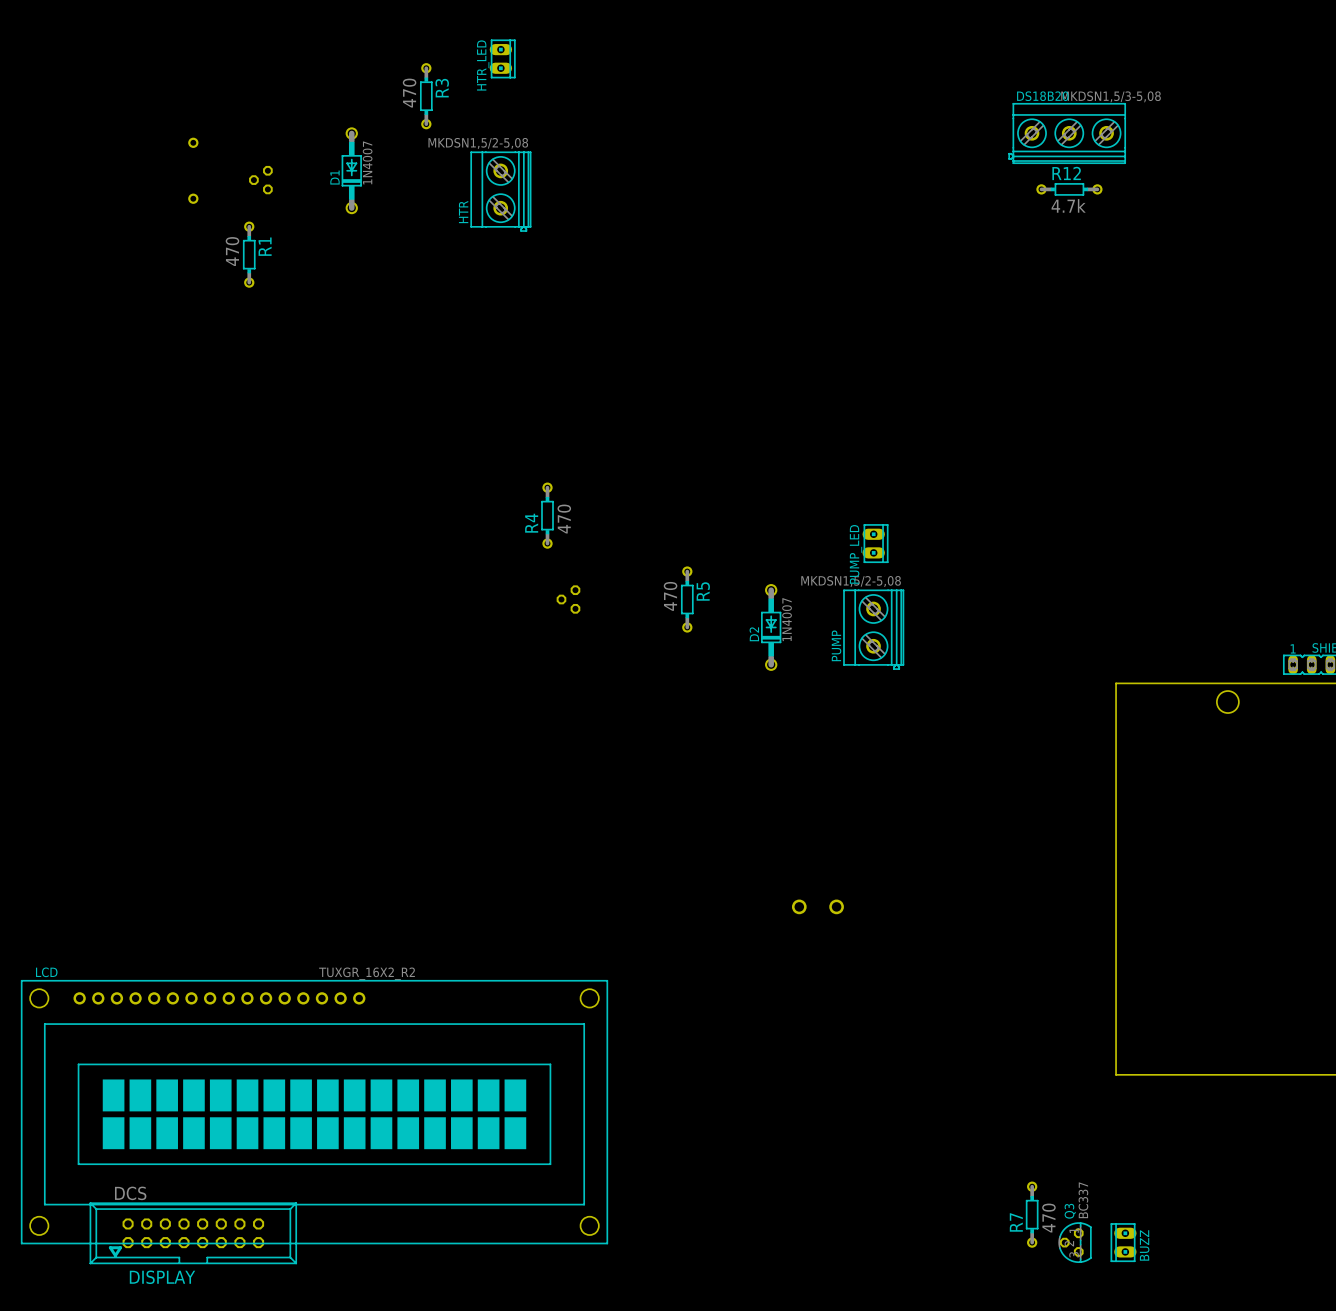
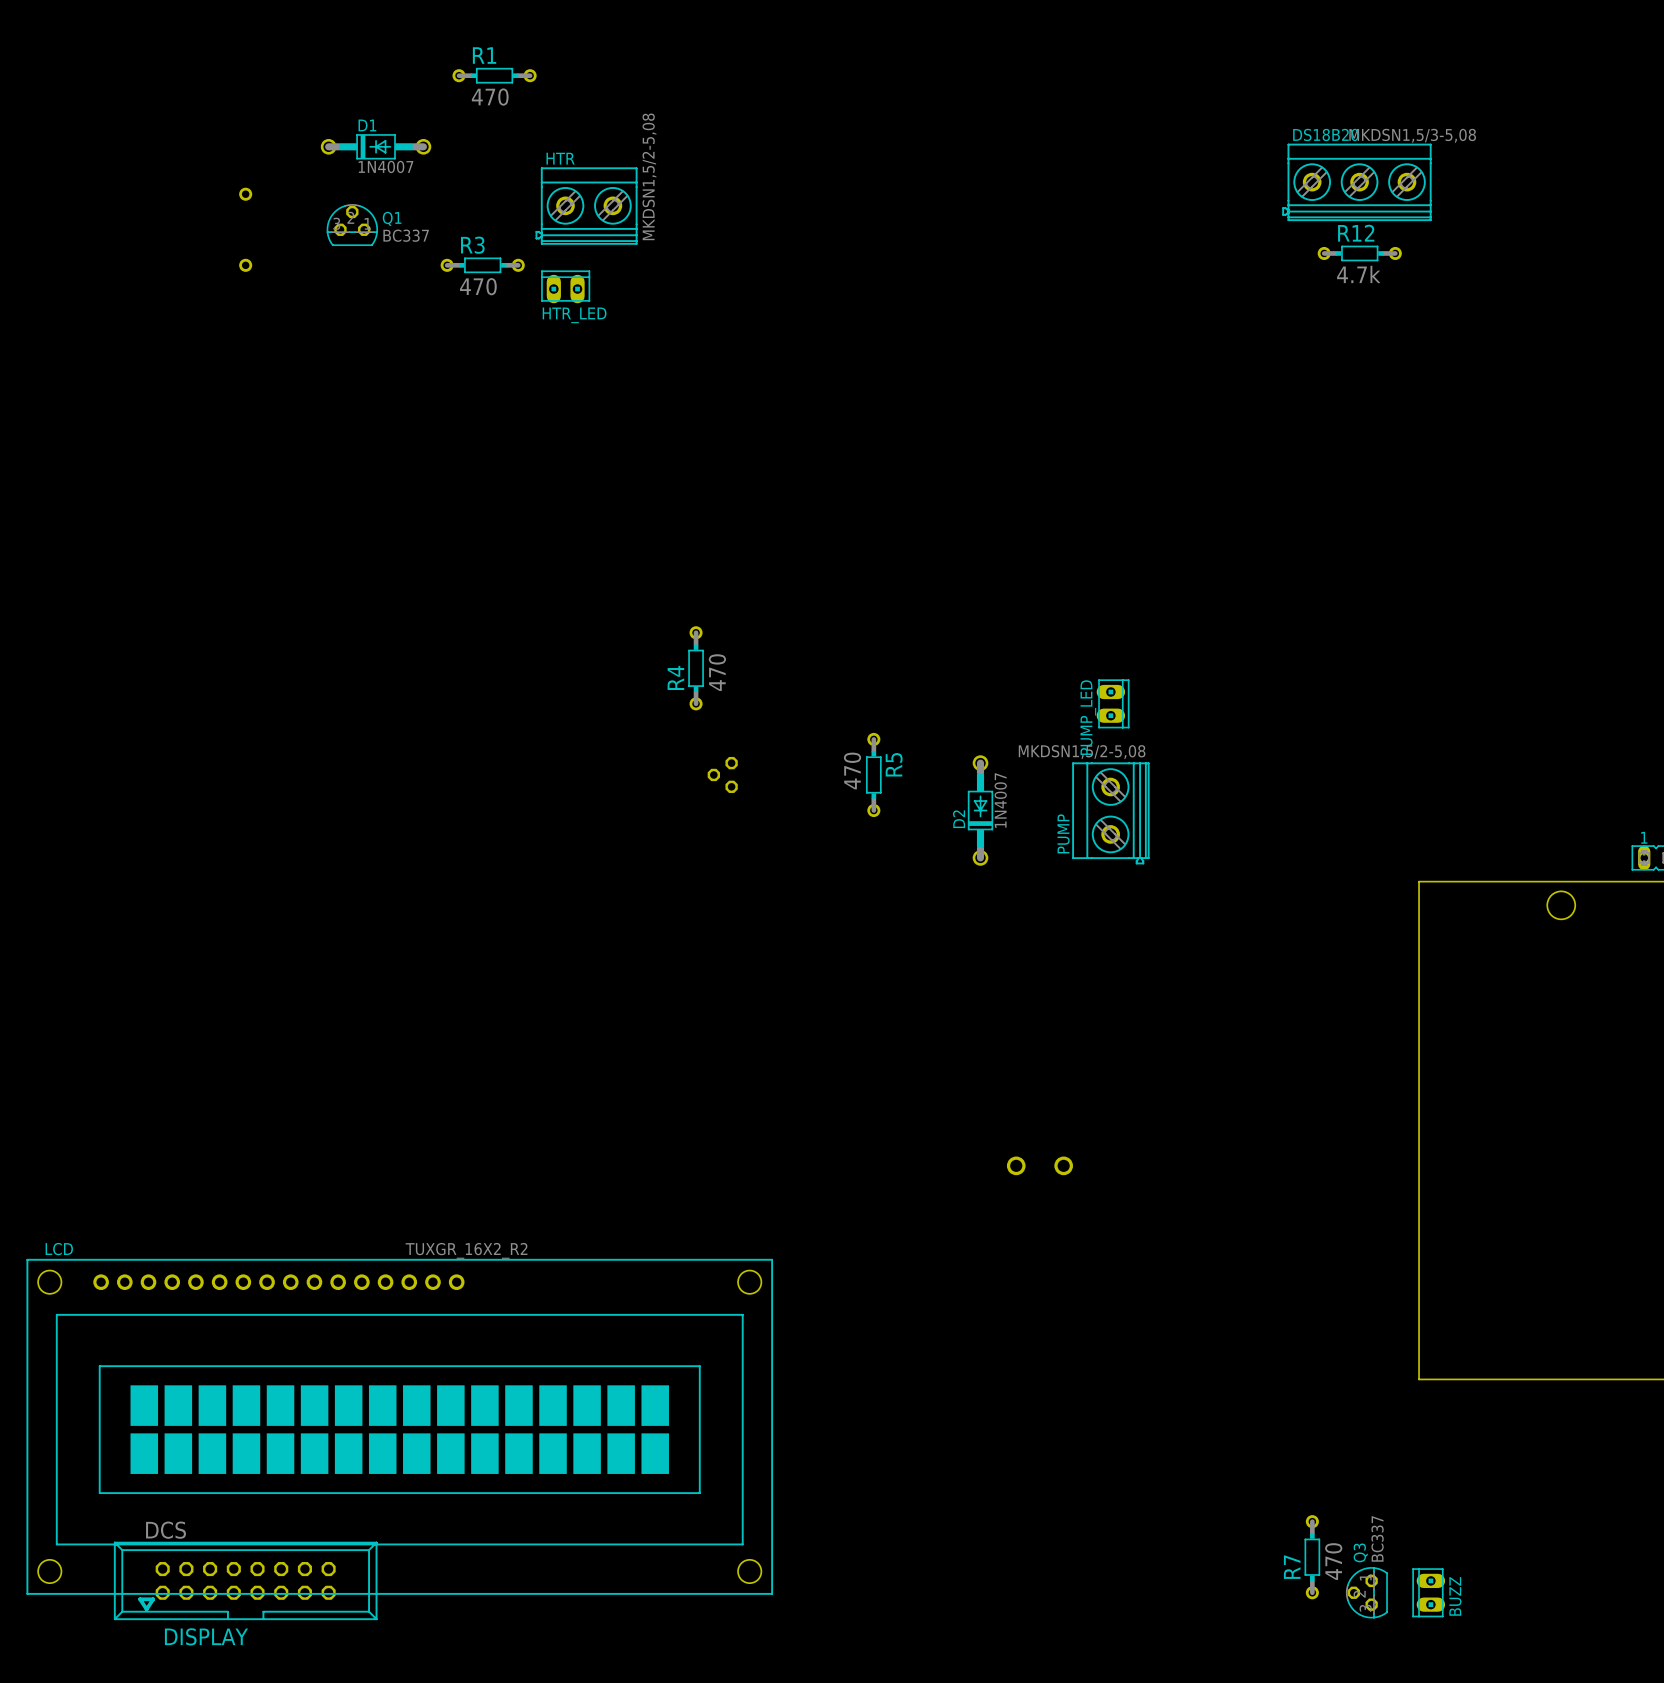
HTR_LED rotation: 0° (502, 58) -> 90° counterclockwise (565, 286)
HTR_LED position: (502, 58) -> (565, 286)
R3 name position: R3 (442, 88) -> R3 (472, 245)
R3 value position: 470 (409, 93) -> 470 (478, 286)
R3 rotation: 0° (426, 96) -> 90° clockwise (482, 265)
R3 position: (426, 96) -> (482, 265)
D1 rotation: 0° (351, 170) -> 90° clockwise (376, 146)
D1 position: (351, 170) -> (376, 146)
Q1 side: bottom (260, 180) -> top (352, 225)
HTR rotation: 0° (500, 191) -> 90° clockwise (586, 206)
HTR position: (500, 191) -> (586, 206)
R1 name position: R1 (265, 246) -> R1 (484, 55)
R1 value position: 470 (232, 251) -> 470 (490, 97)
R1 rotation: 0° (249, 254) -> 90° clockwise (494, 75)
R1 position: (249, 254) -> (494, 75)

